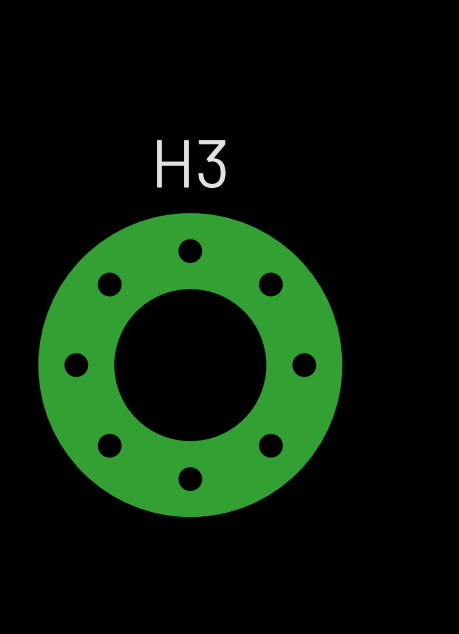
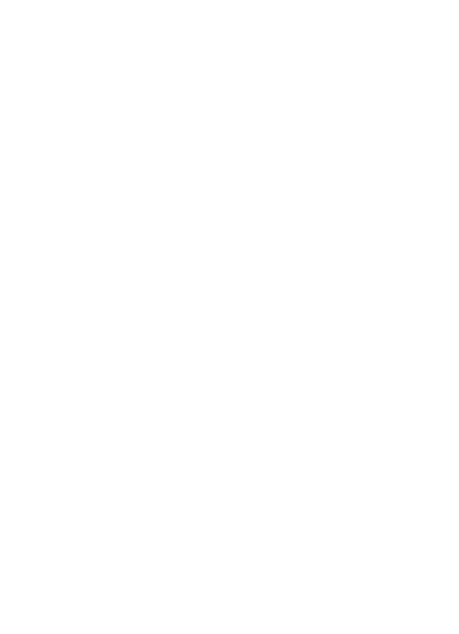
H3: (190, 365) -> none

